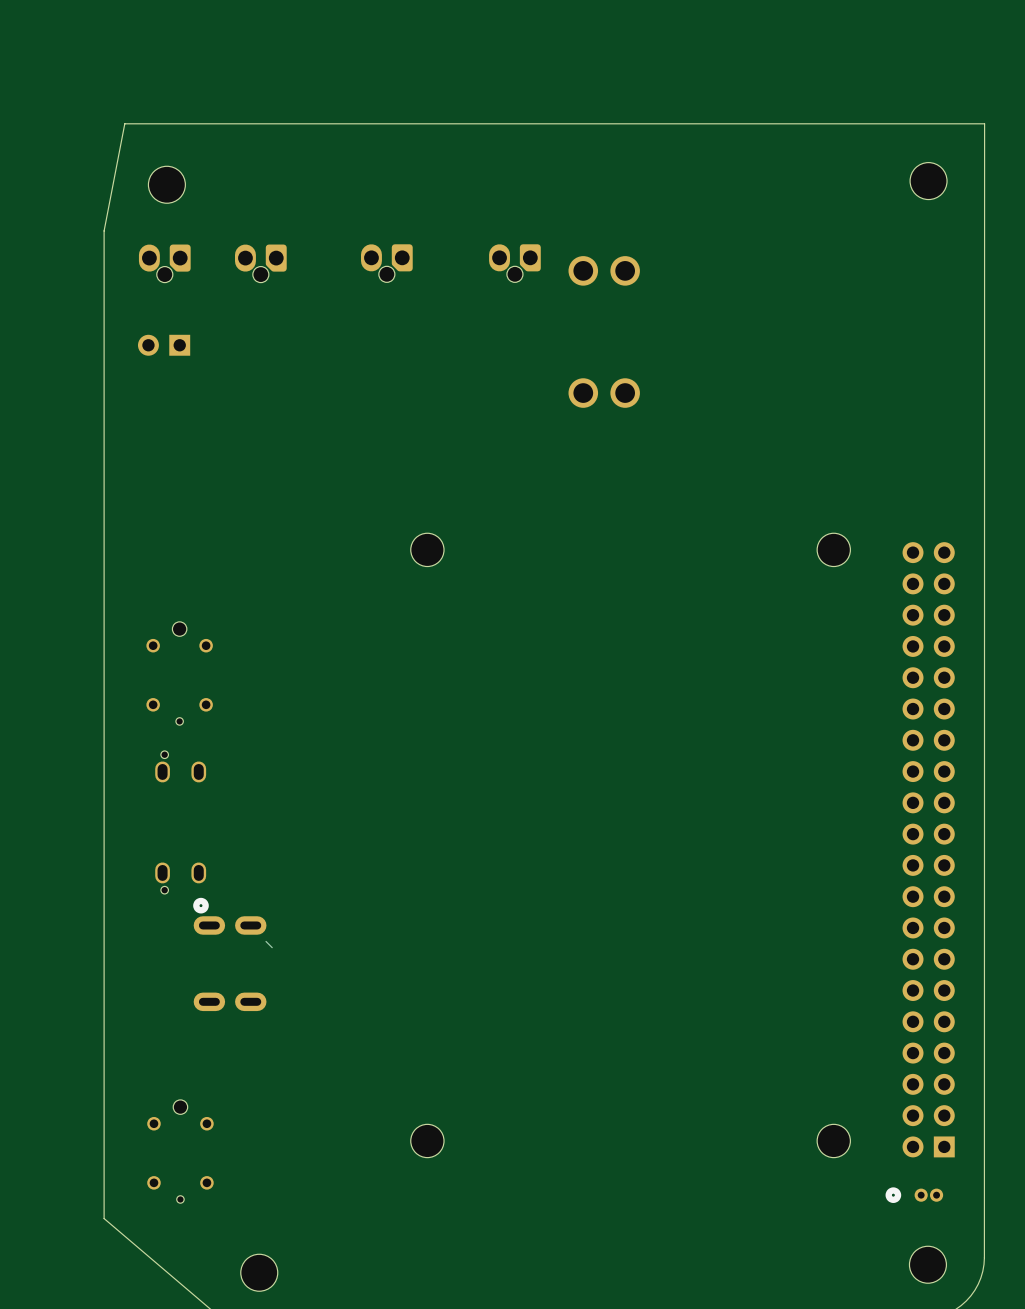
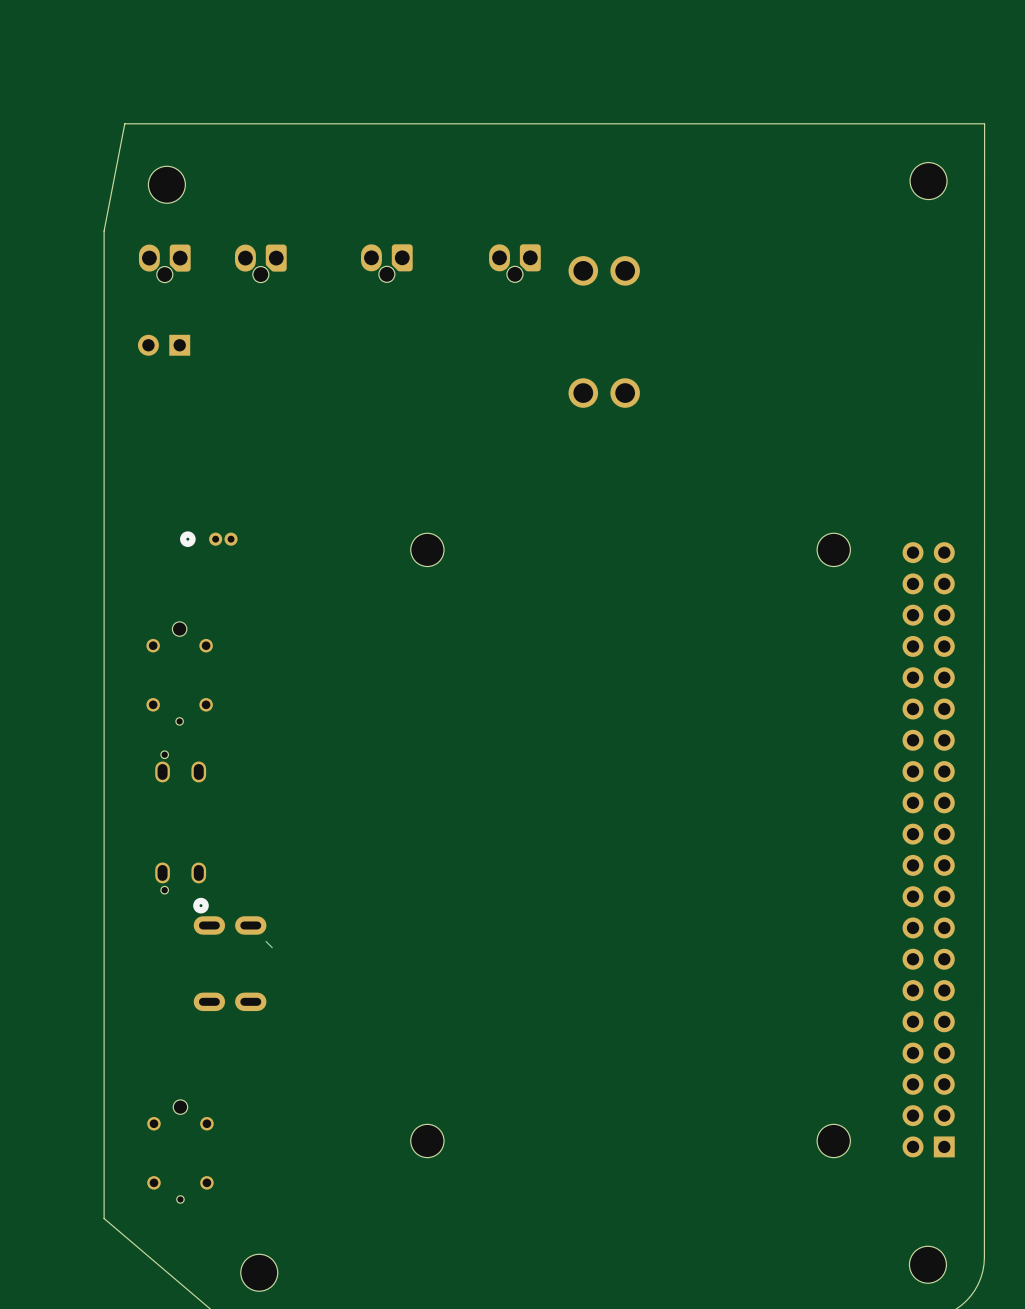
part: none -> (208, 539)
part: (914, 1195) -> none

